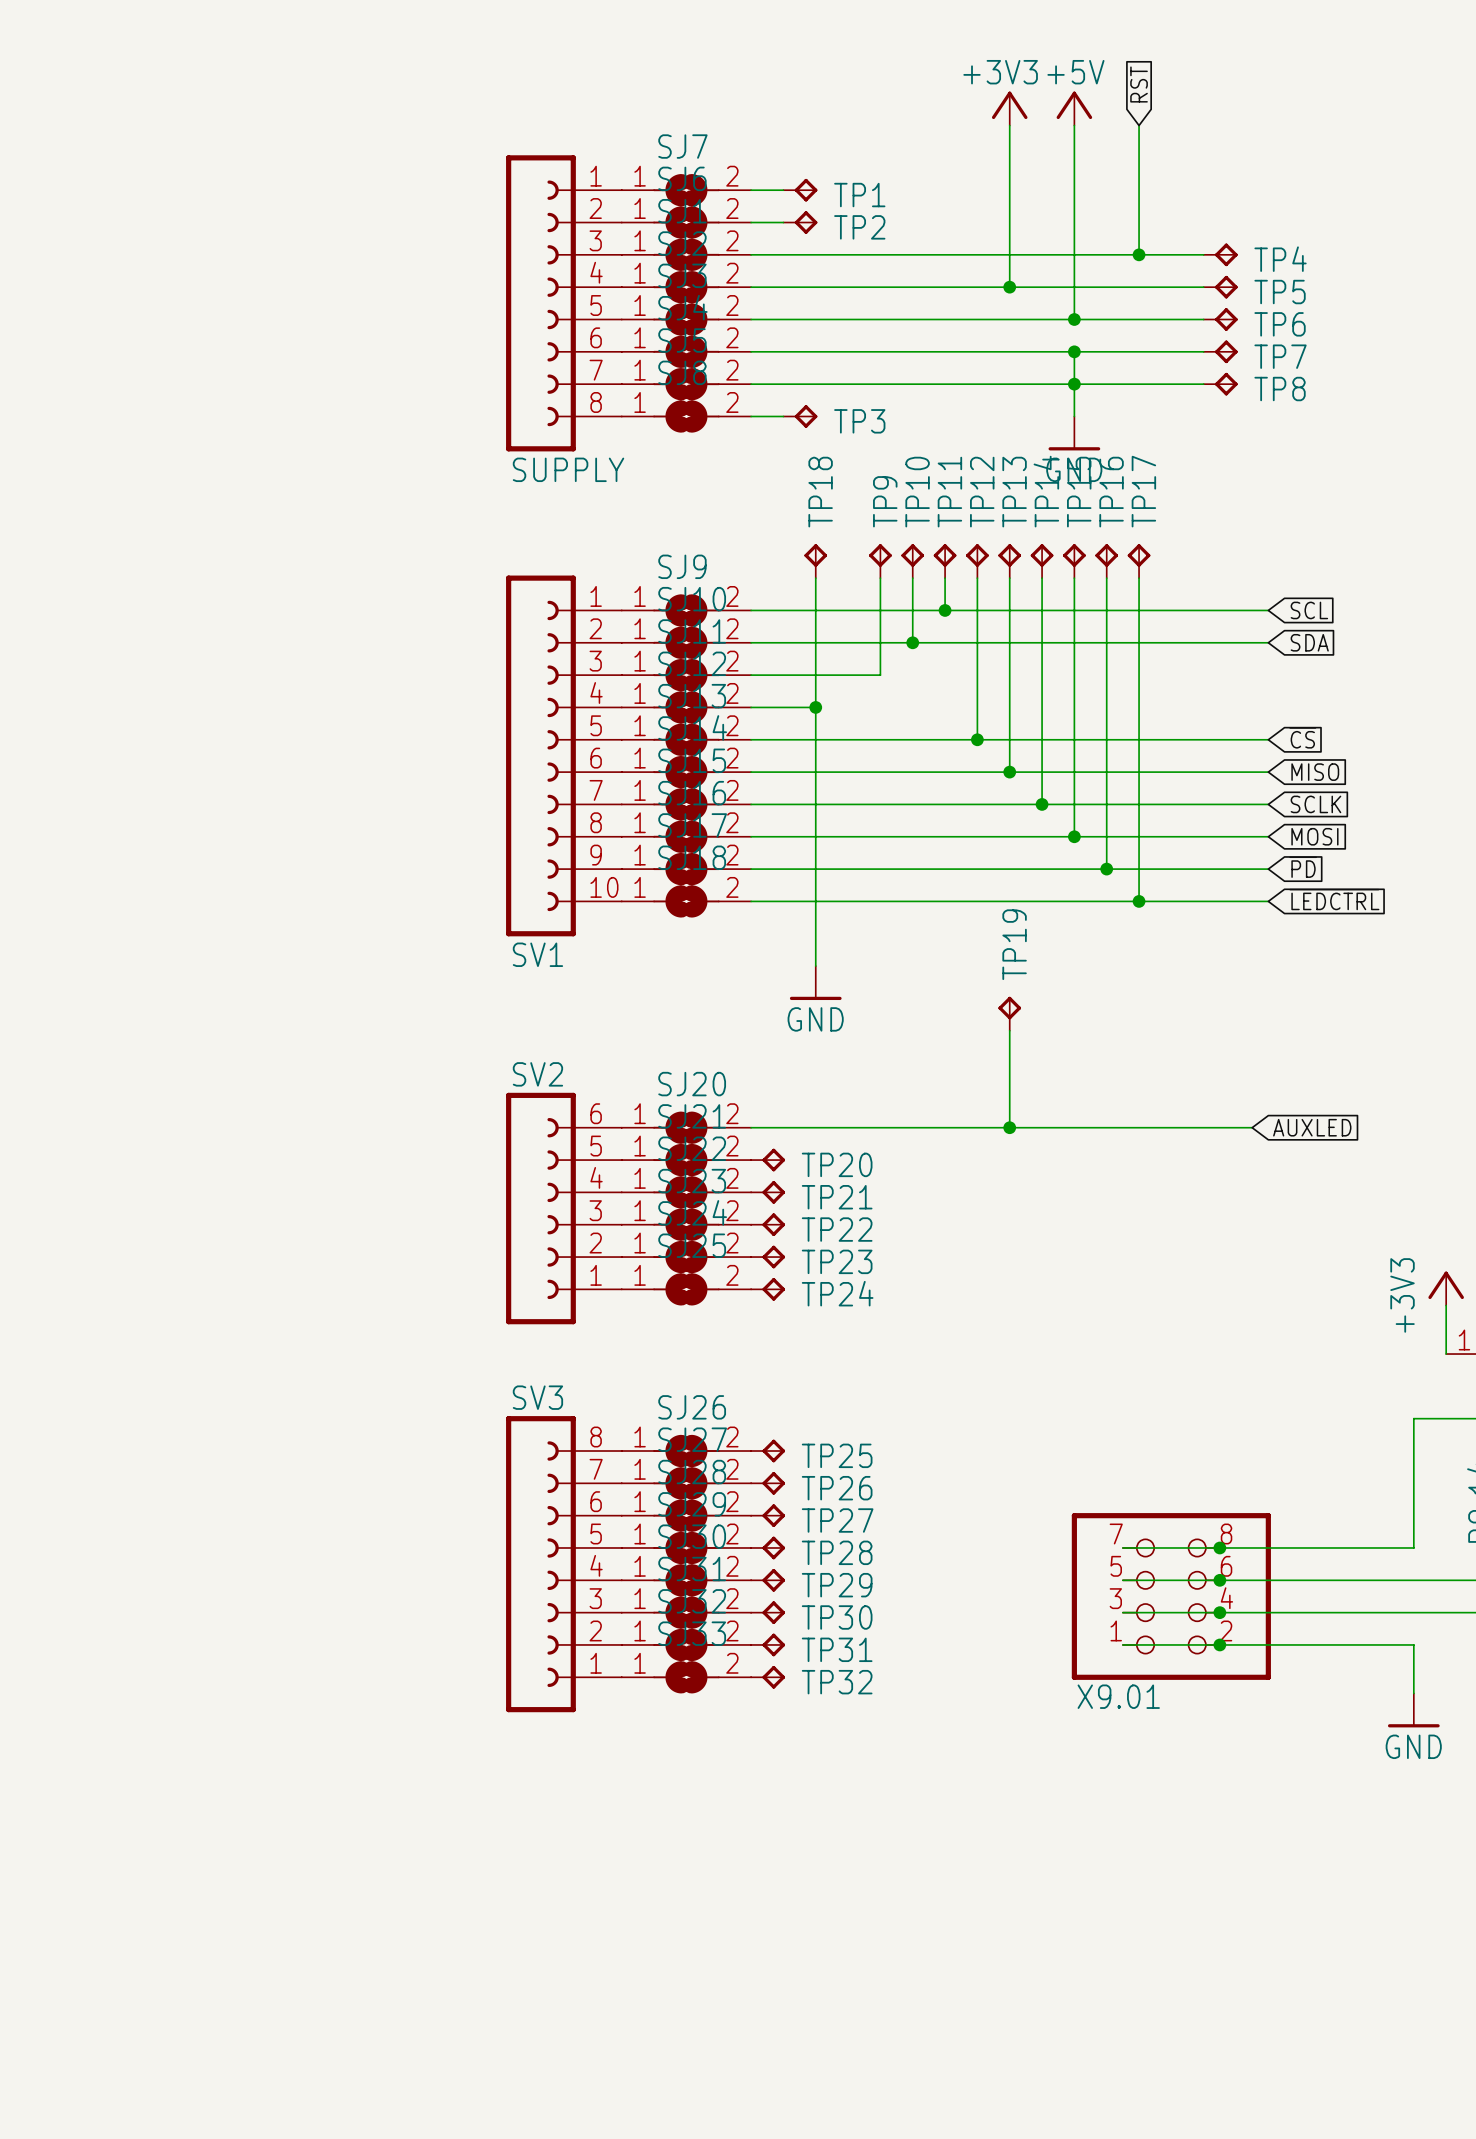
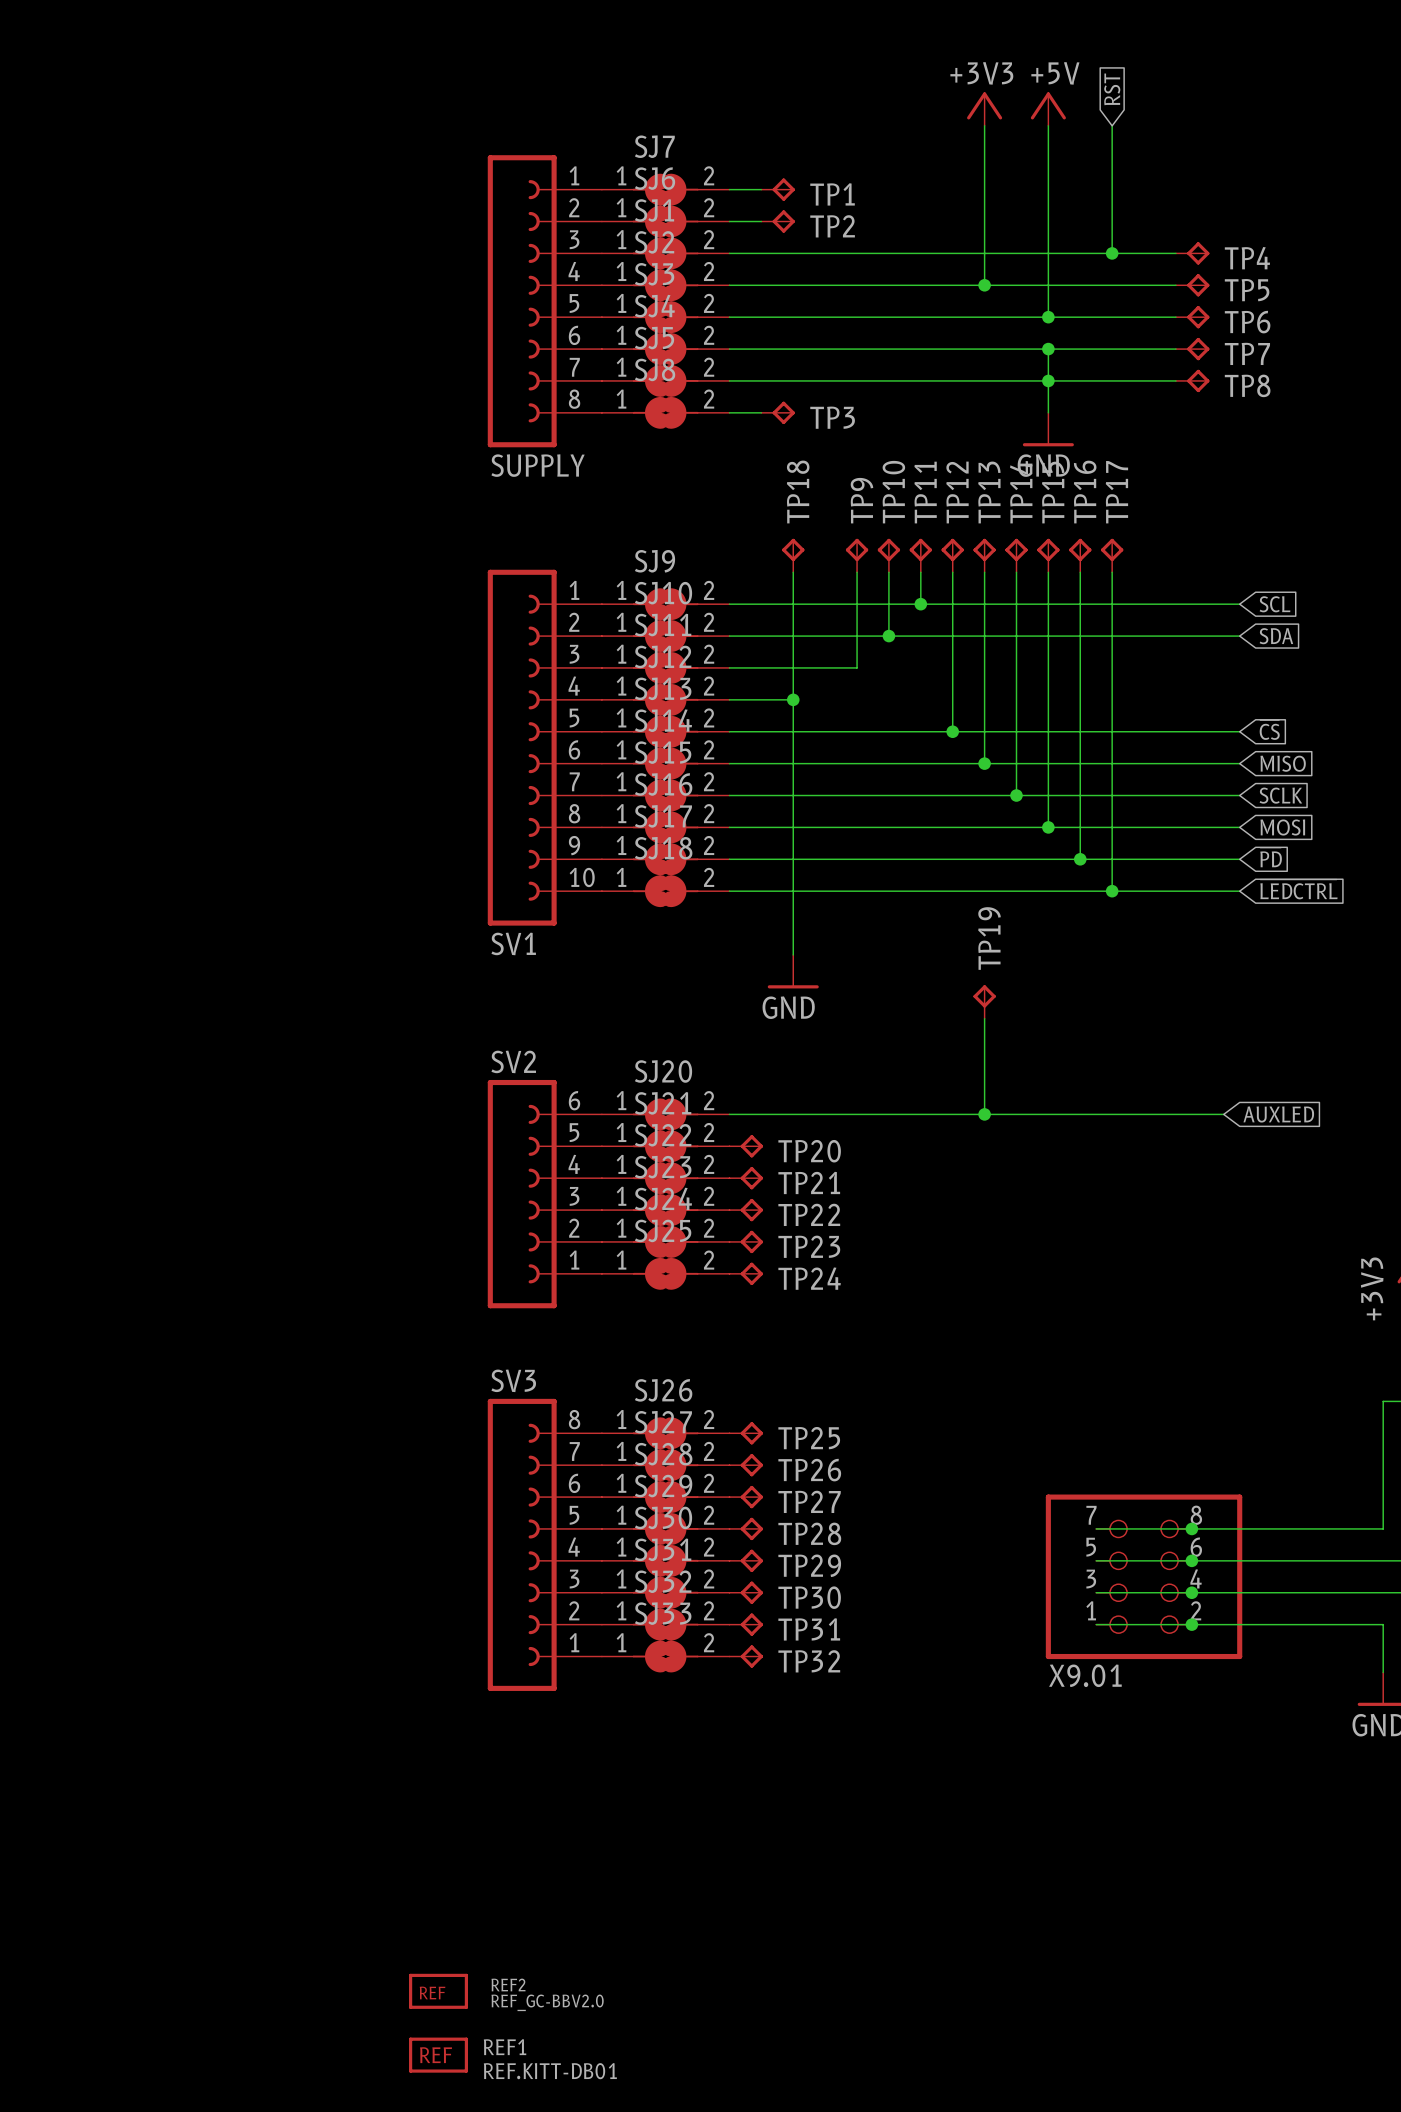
REF2: none -> REF_GC-BBV2.0 (438, 1991)
REF1: none -> REF.KITT-DB01 (438, 2055)

